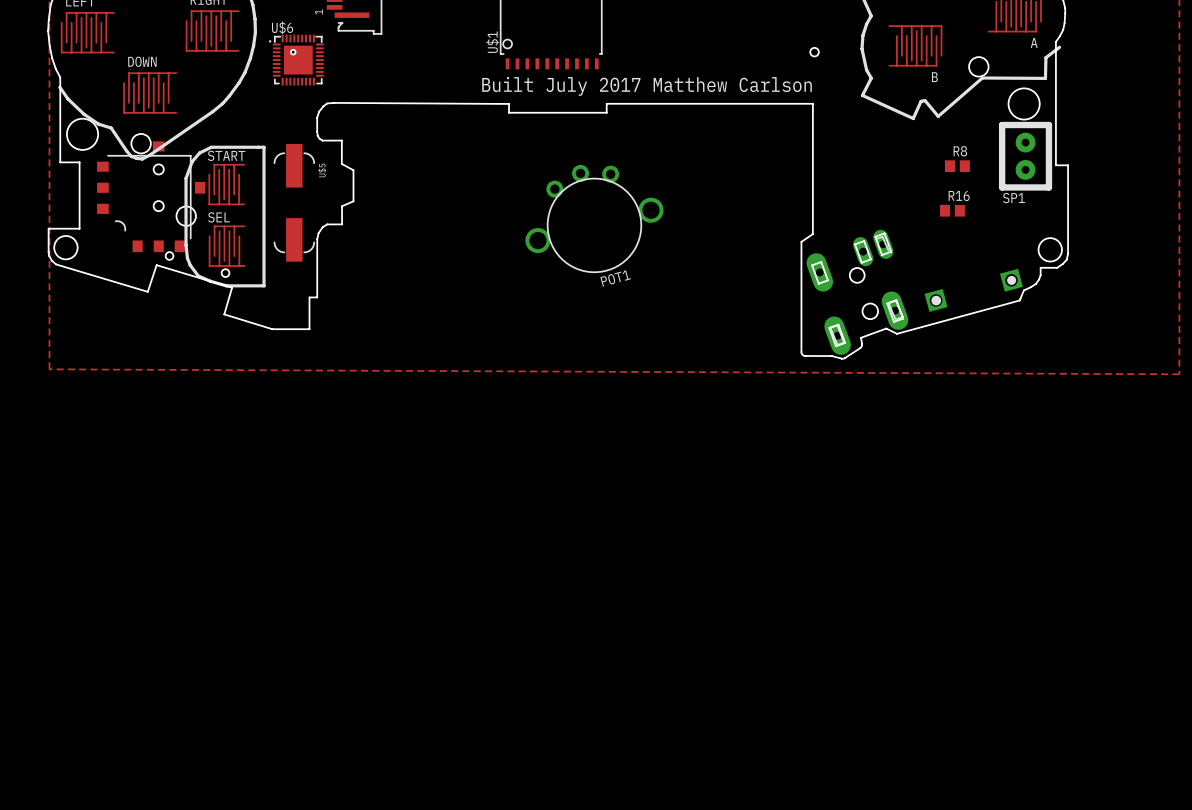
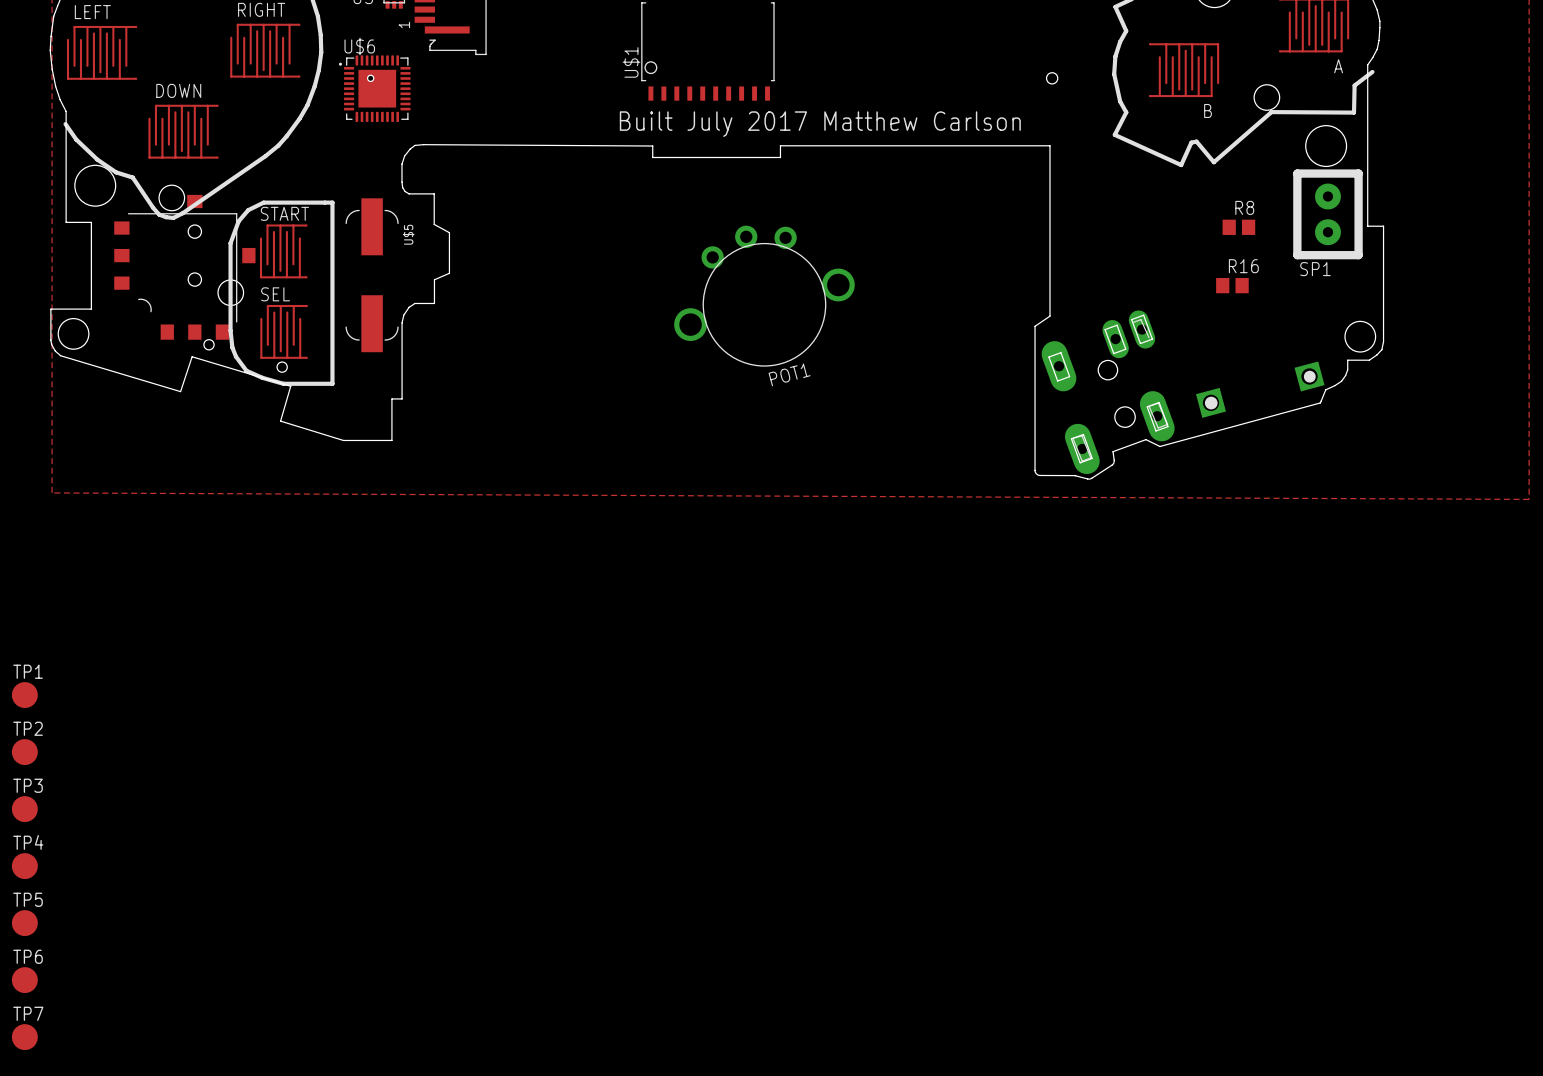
TP1: none -> (24, 695)
TP2: none -> (24, 752)
TP3: none -> (24, 809)
TP4: none -> (24, 866)
TP5: none -> (24, 923)
TP6: none -> (24, 980)
TP7: none -> (24, 1037)

